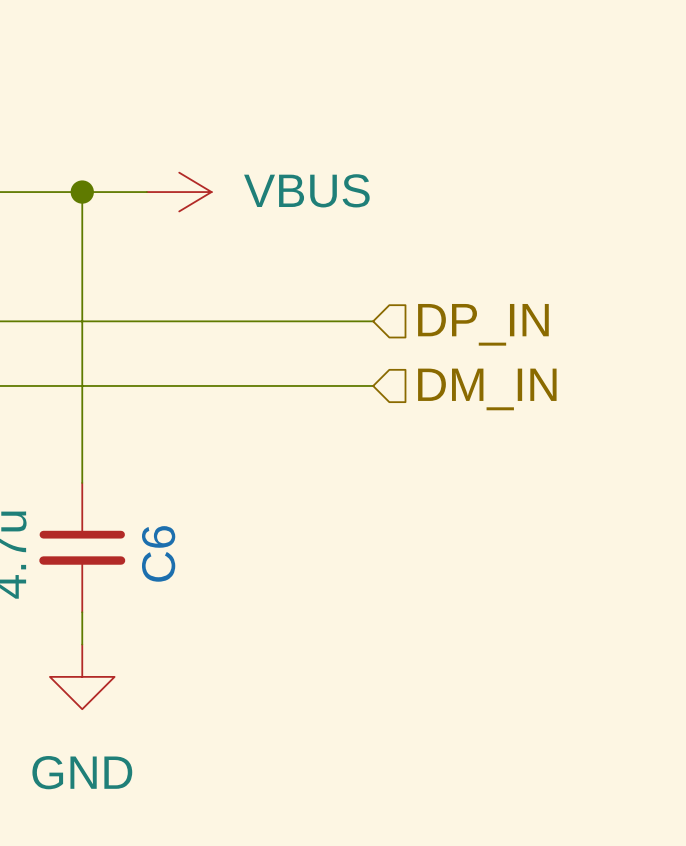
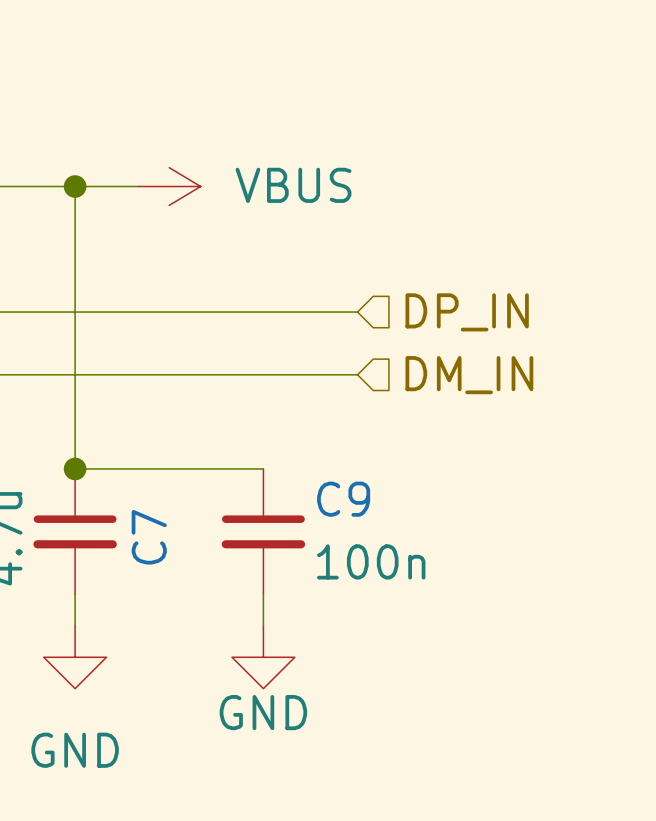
wire: none -> (75, 468) (263, 468)
junction: none -> (75, 468)
C9: none -> 100n (263, 531)
C6 name: C6 (158, 553) -> C7 (149, 537)
wire: none -> (263, 594) (263, 625)
power symbol: none -> GND (263, 657)

